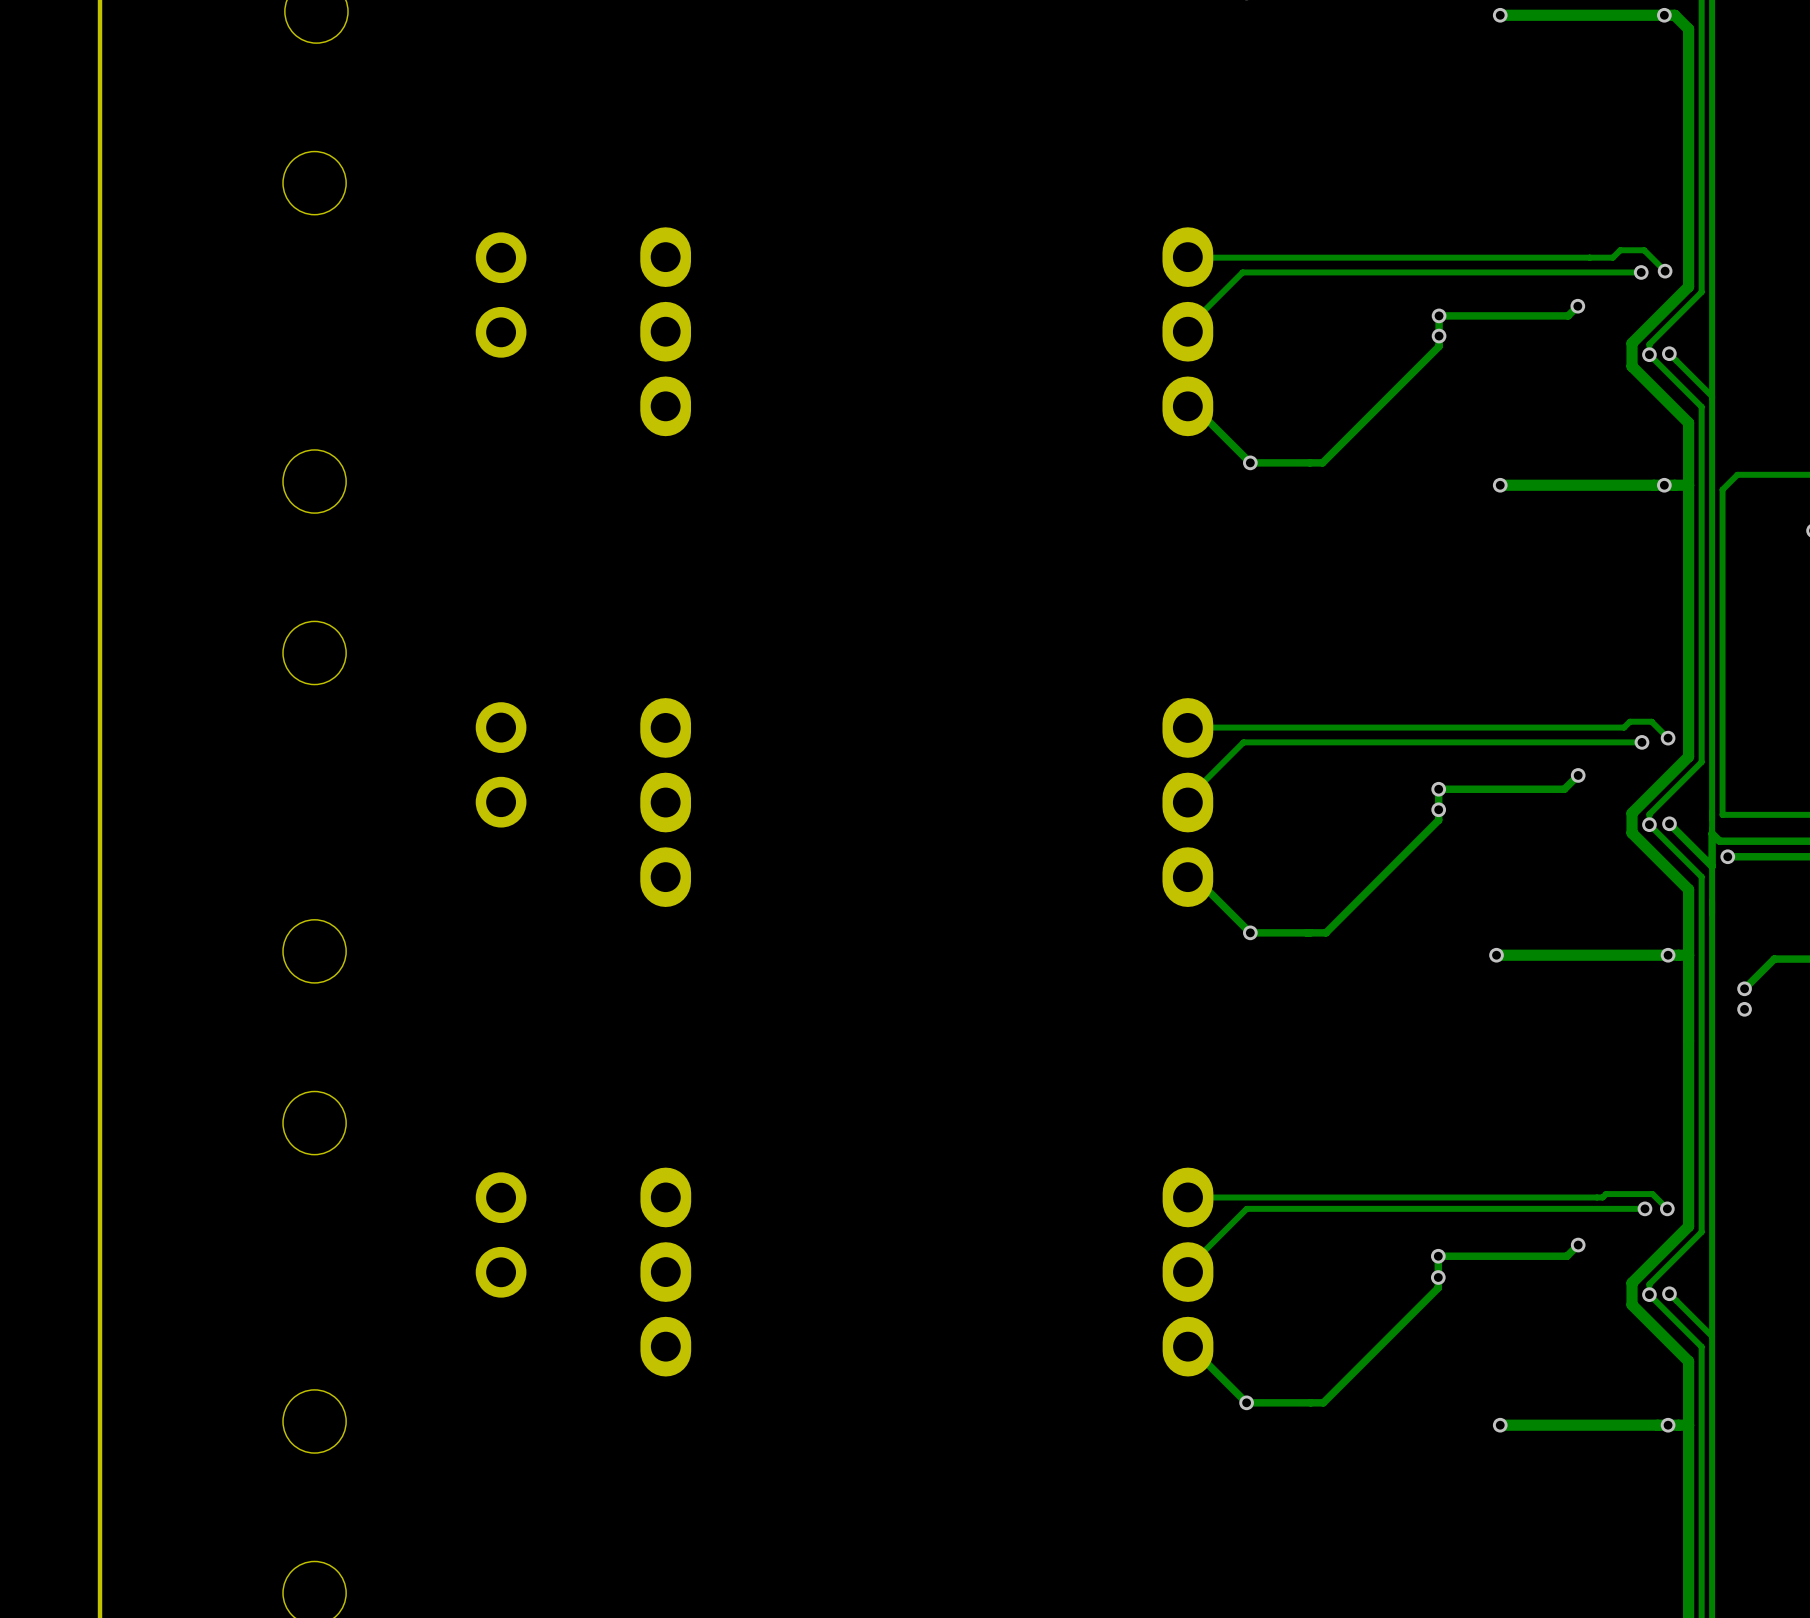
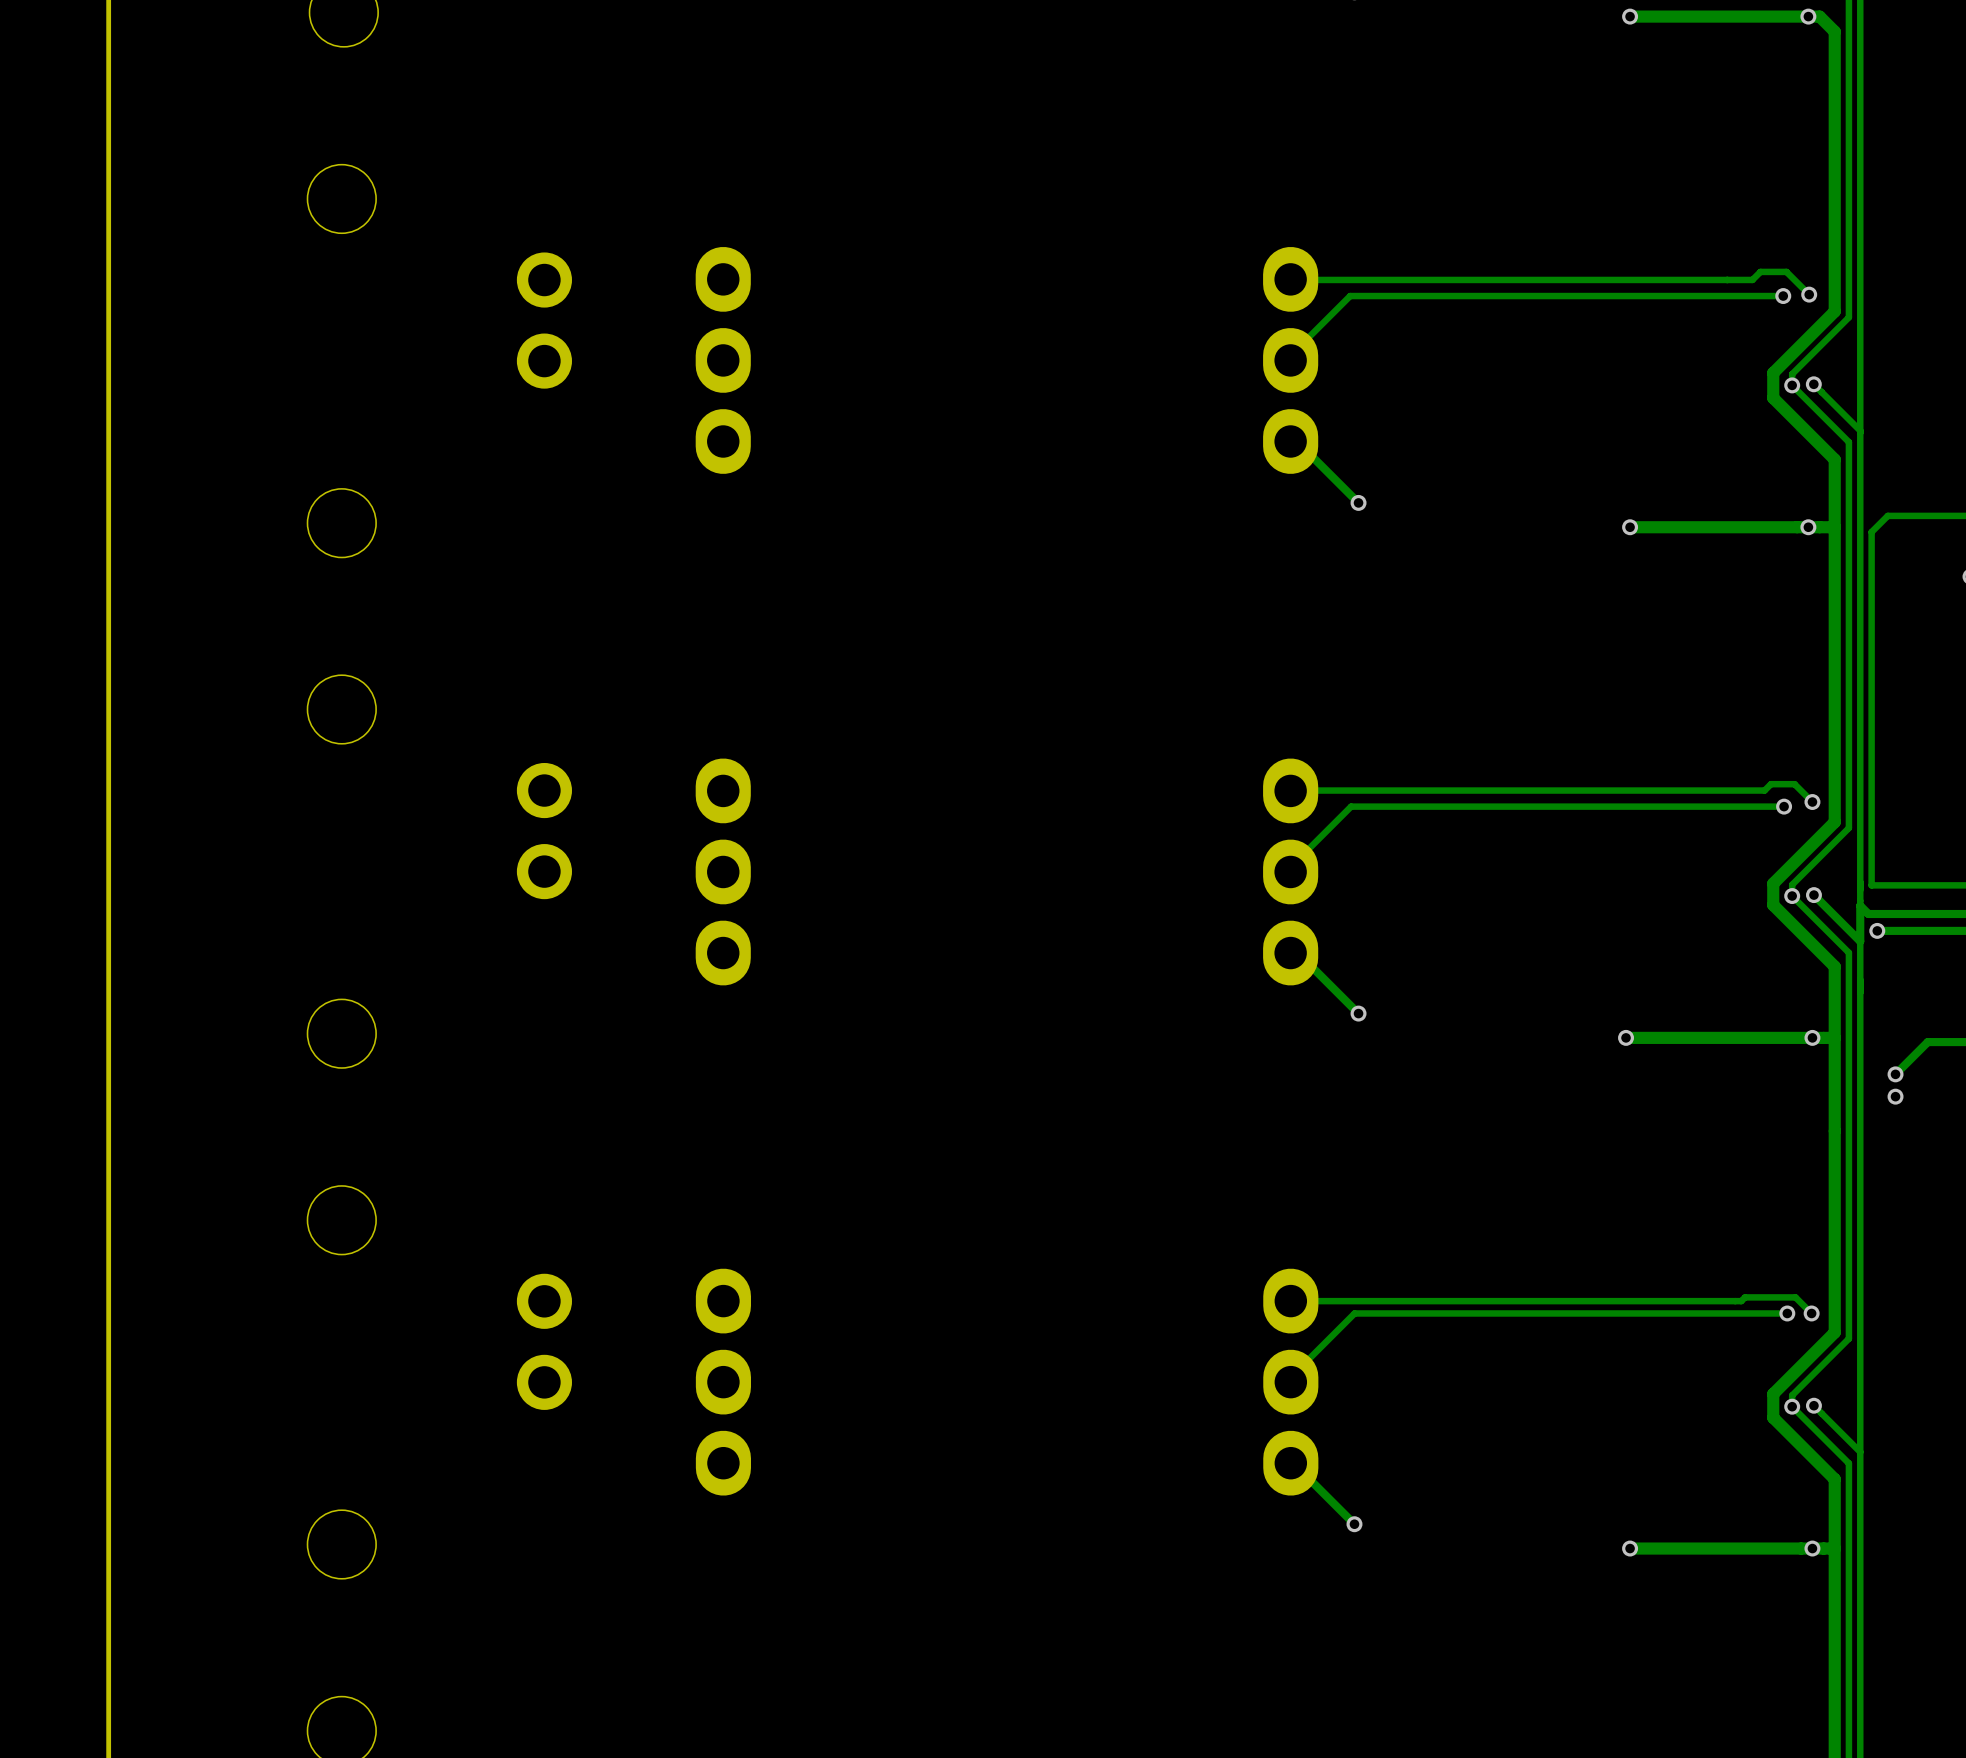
track: (1577, 306) (1568, 315) (1439, 315) (1439, 346) (1322, 462) (1250, 462) -> none
via: (1577, 306) -> none
via: (1439, 315) -> none
via: (1439, 336) -> none
track: (1578, 775) (1564, 789) (1438, 789) (1438, 820) (1325, 932) (1250, 932) -> none
via: (1578, 775) -> none
via: (1438, 789) -> none
via: (1438, 809) -> none
track: (1578, 1245) (1567, 1256) (1438, 1256) (1438, 1287) (1323, 1402) (1246, 1402) -> none
via: (1578, 1245) -> none
via: (1438, 1256) -> none
via: (1438, 1277) -> none

